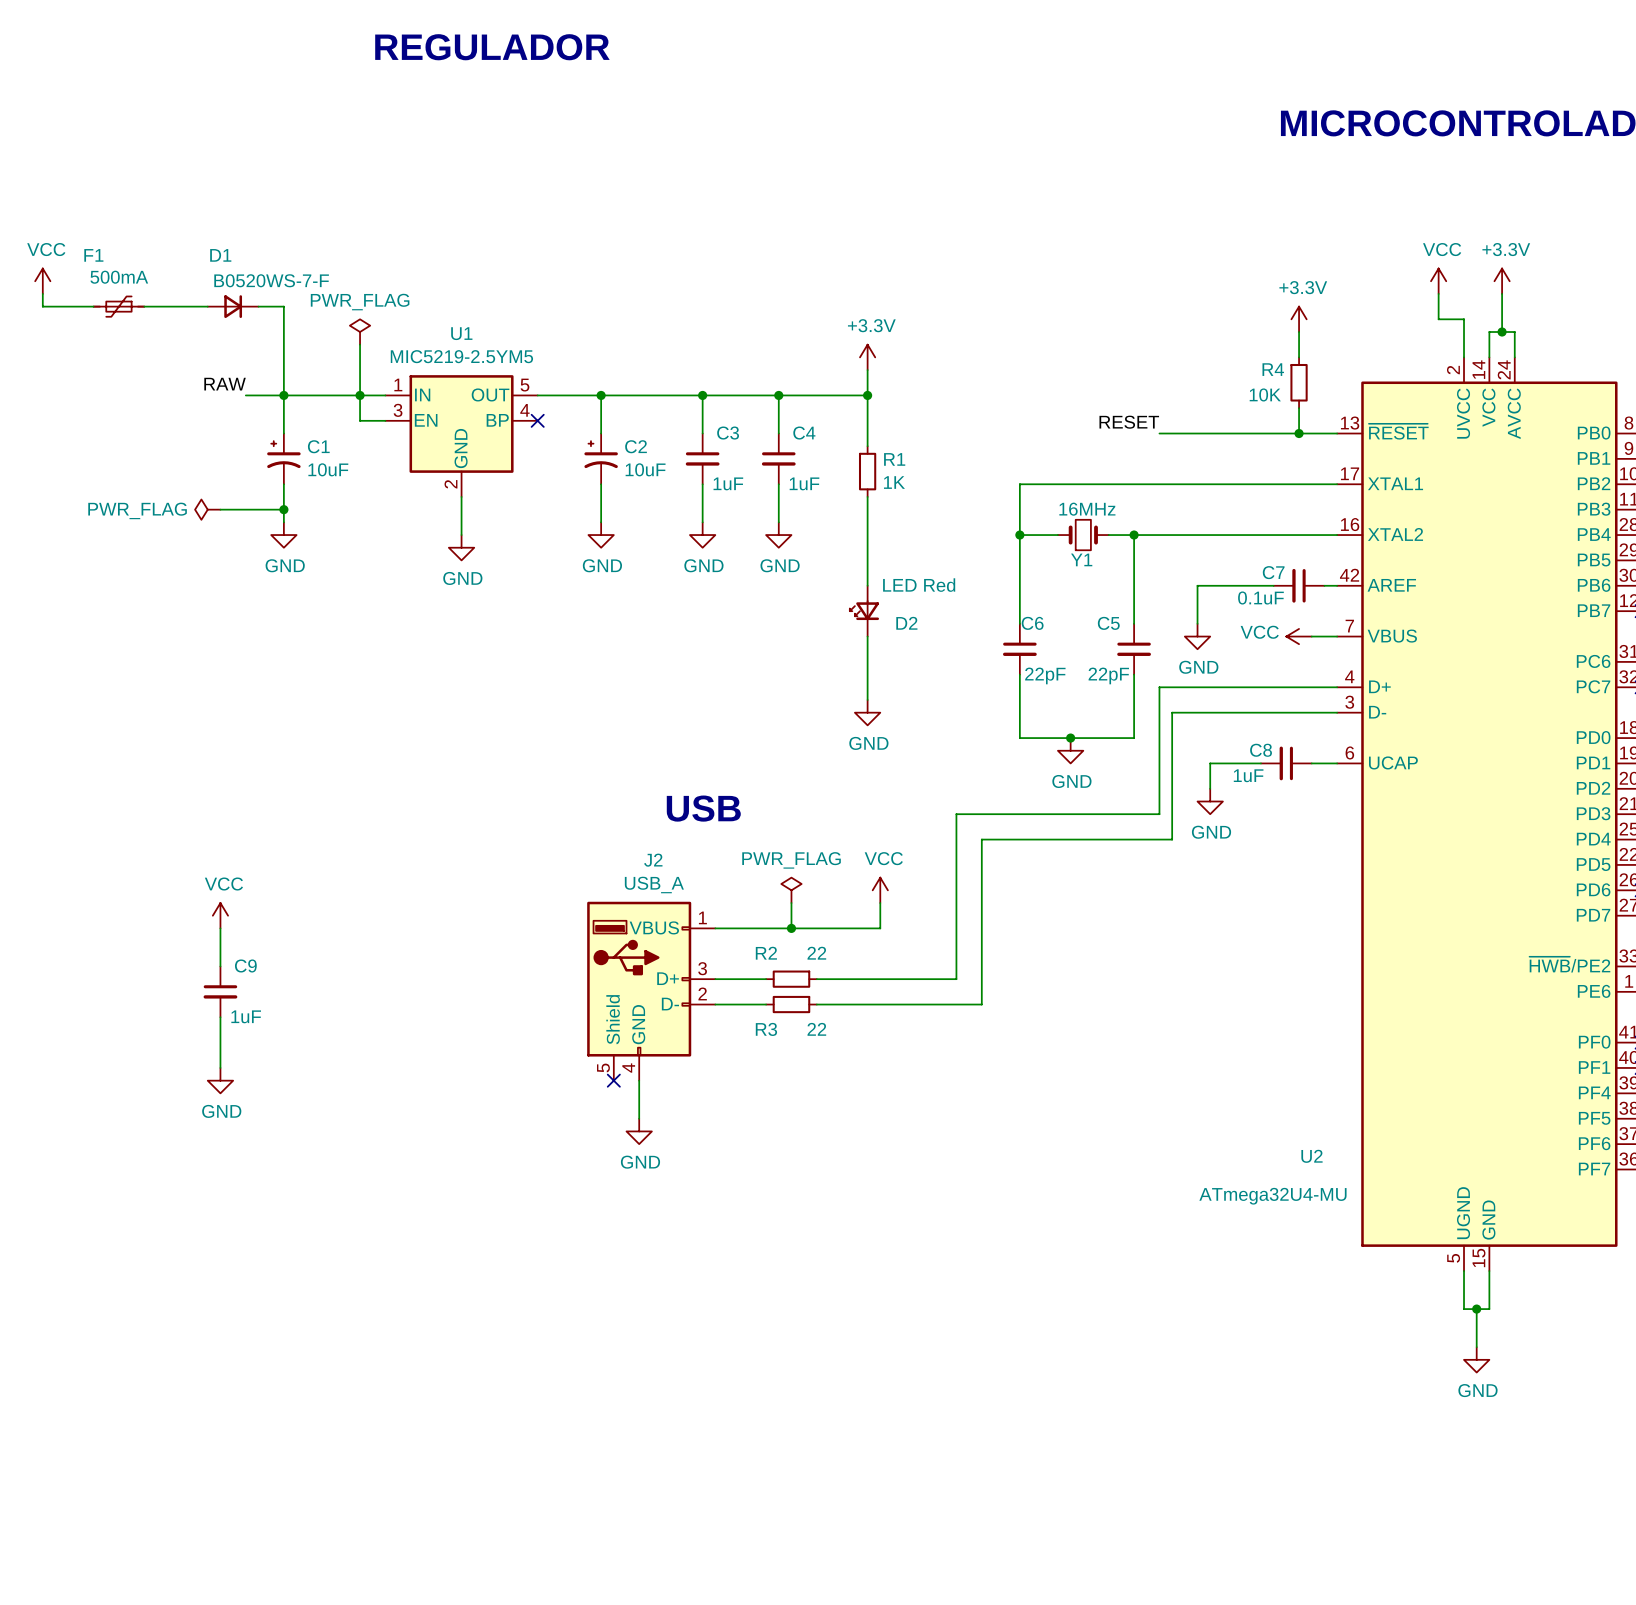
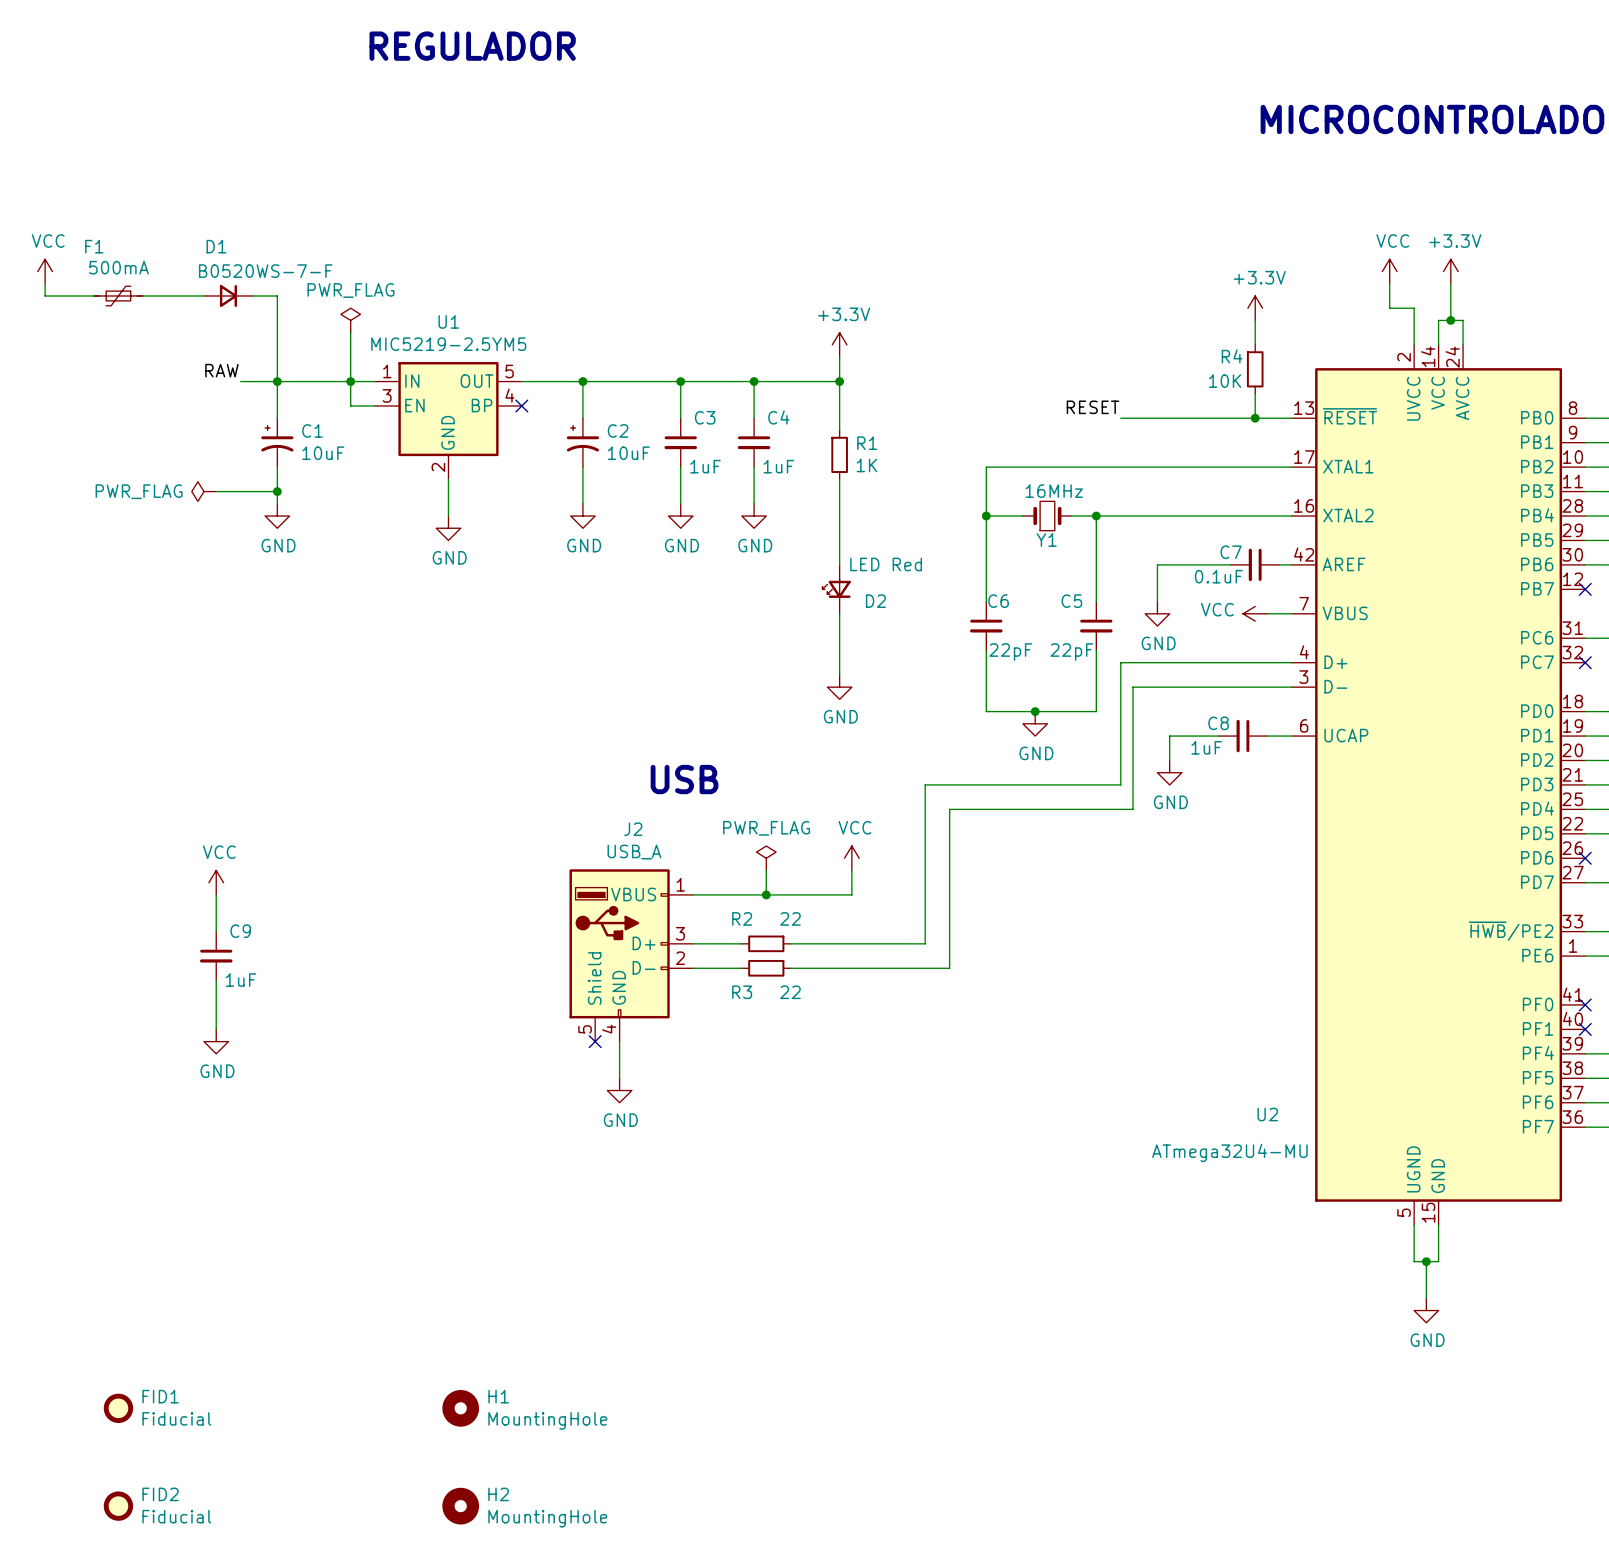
FID1: none -> Fiducial (118, 1408)
H1: none -> MountingHole (460, 1408)
FID2: none -> Fiducial (118, 1506)
H2: none -> MountingHole (460, 1506)

